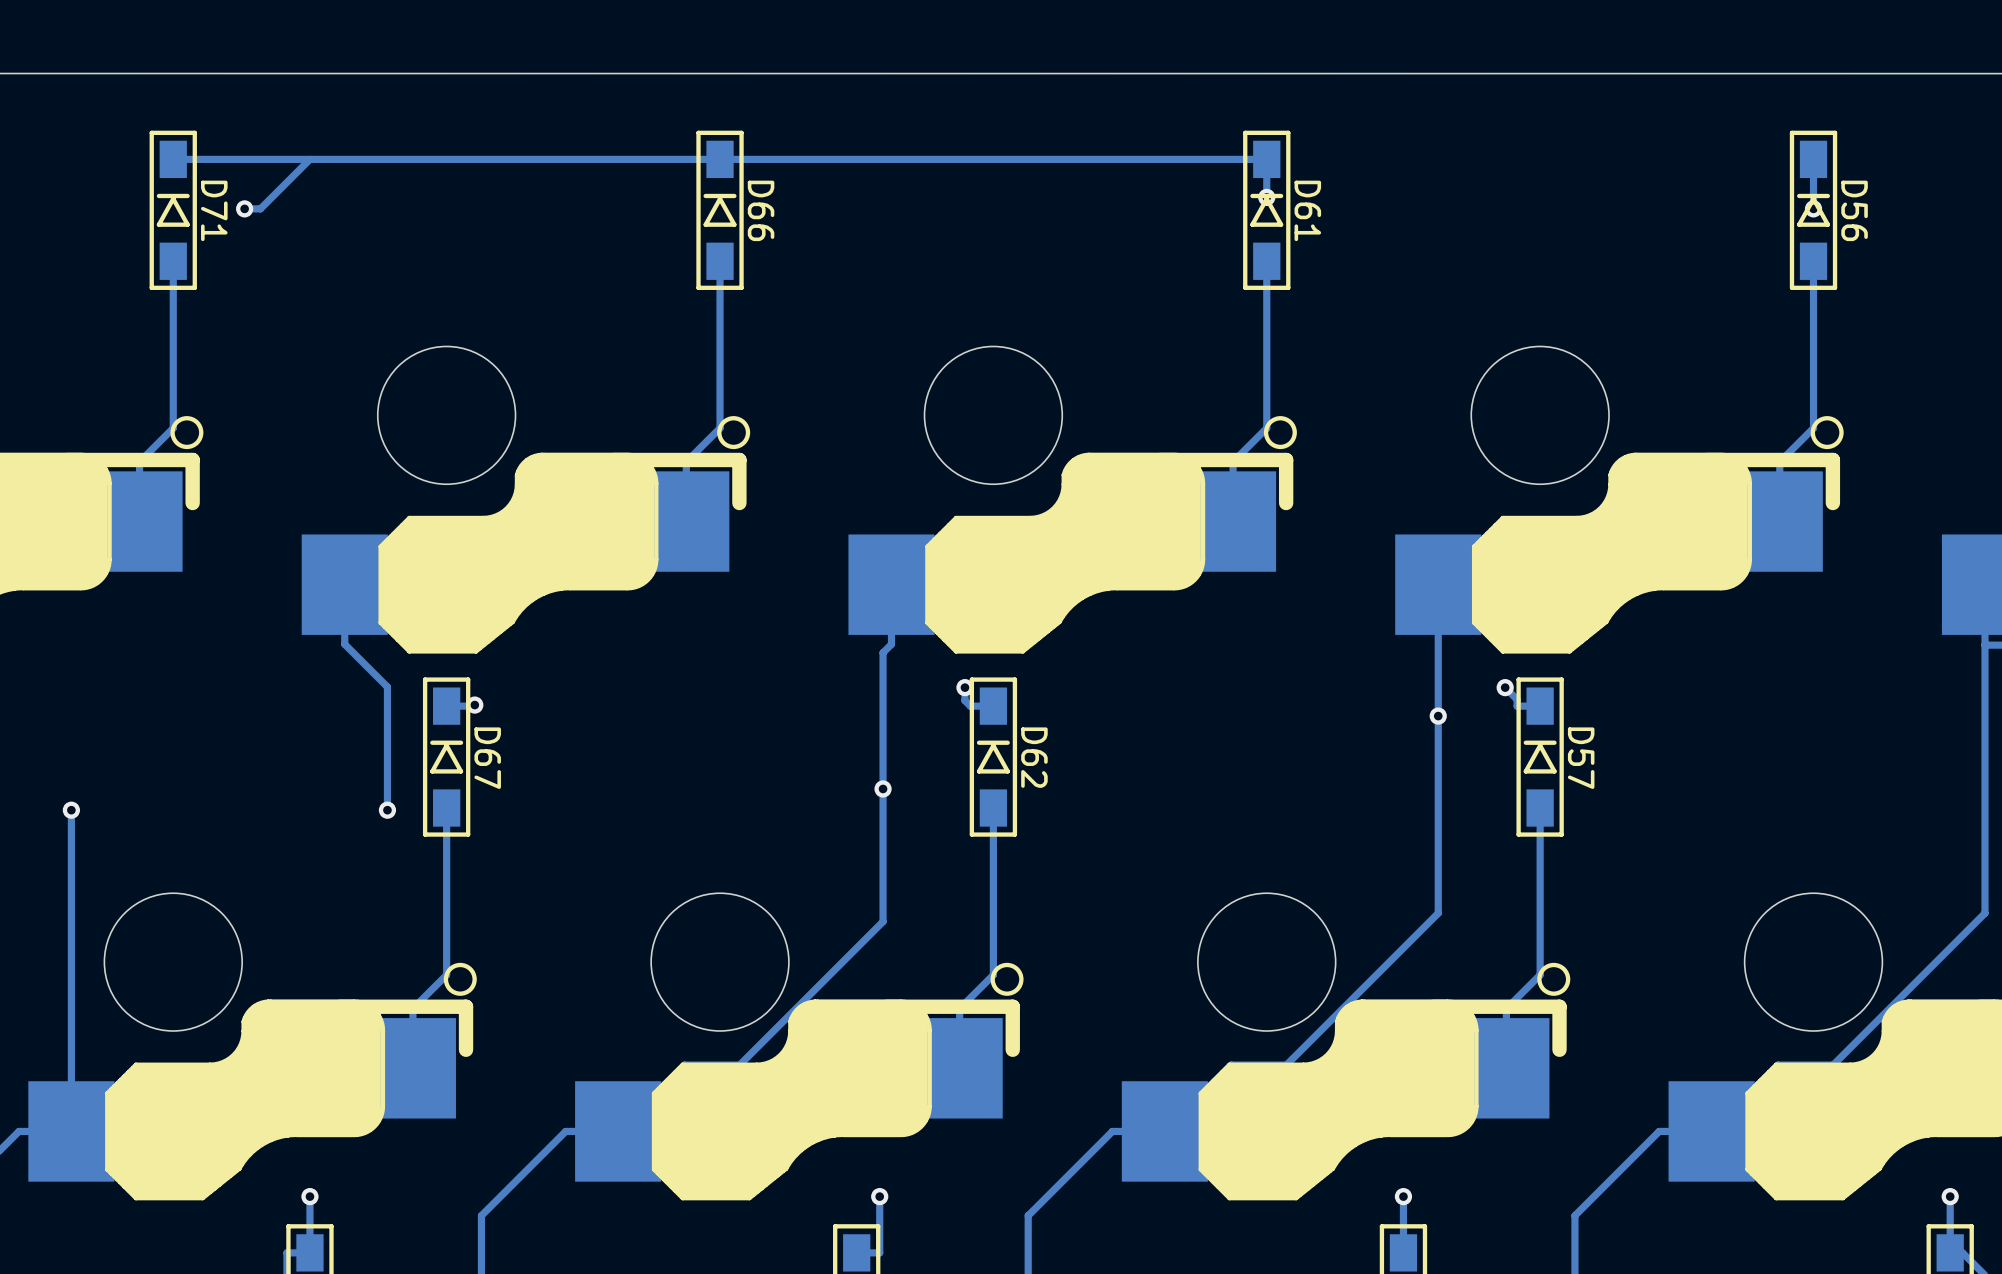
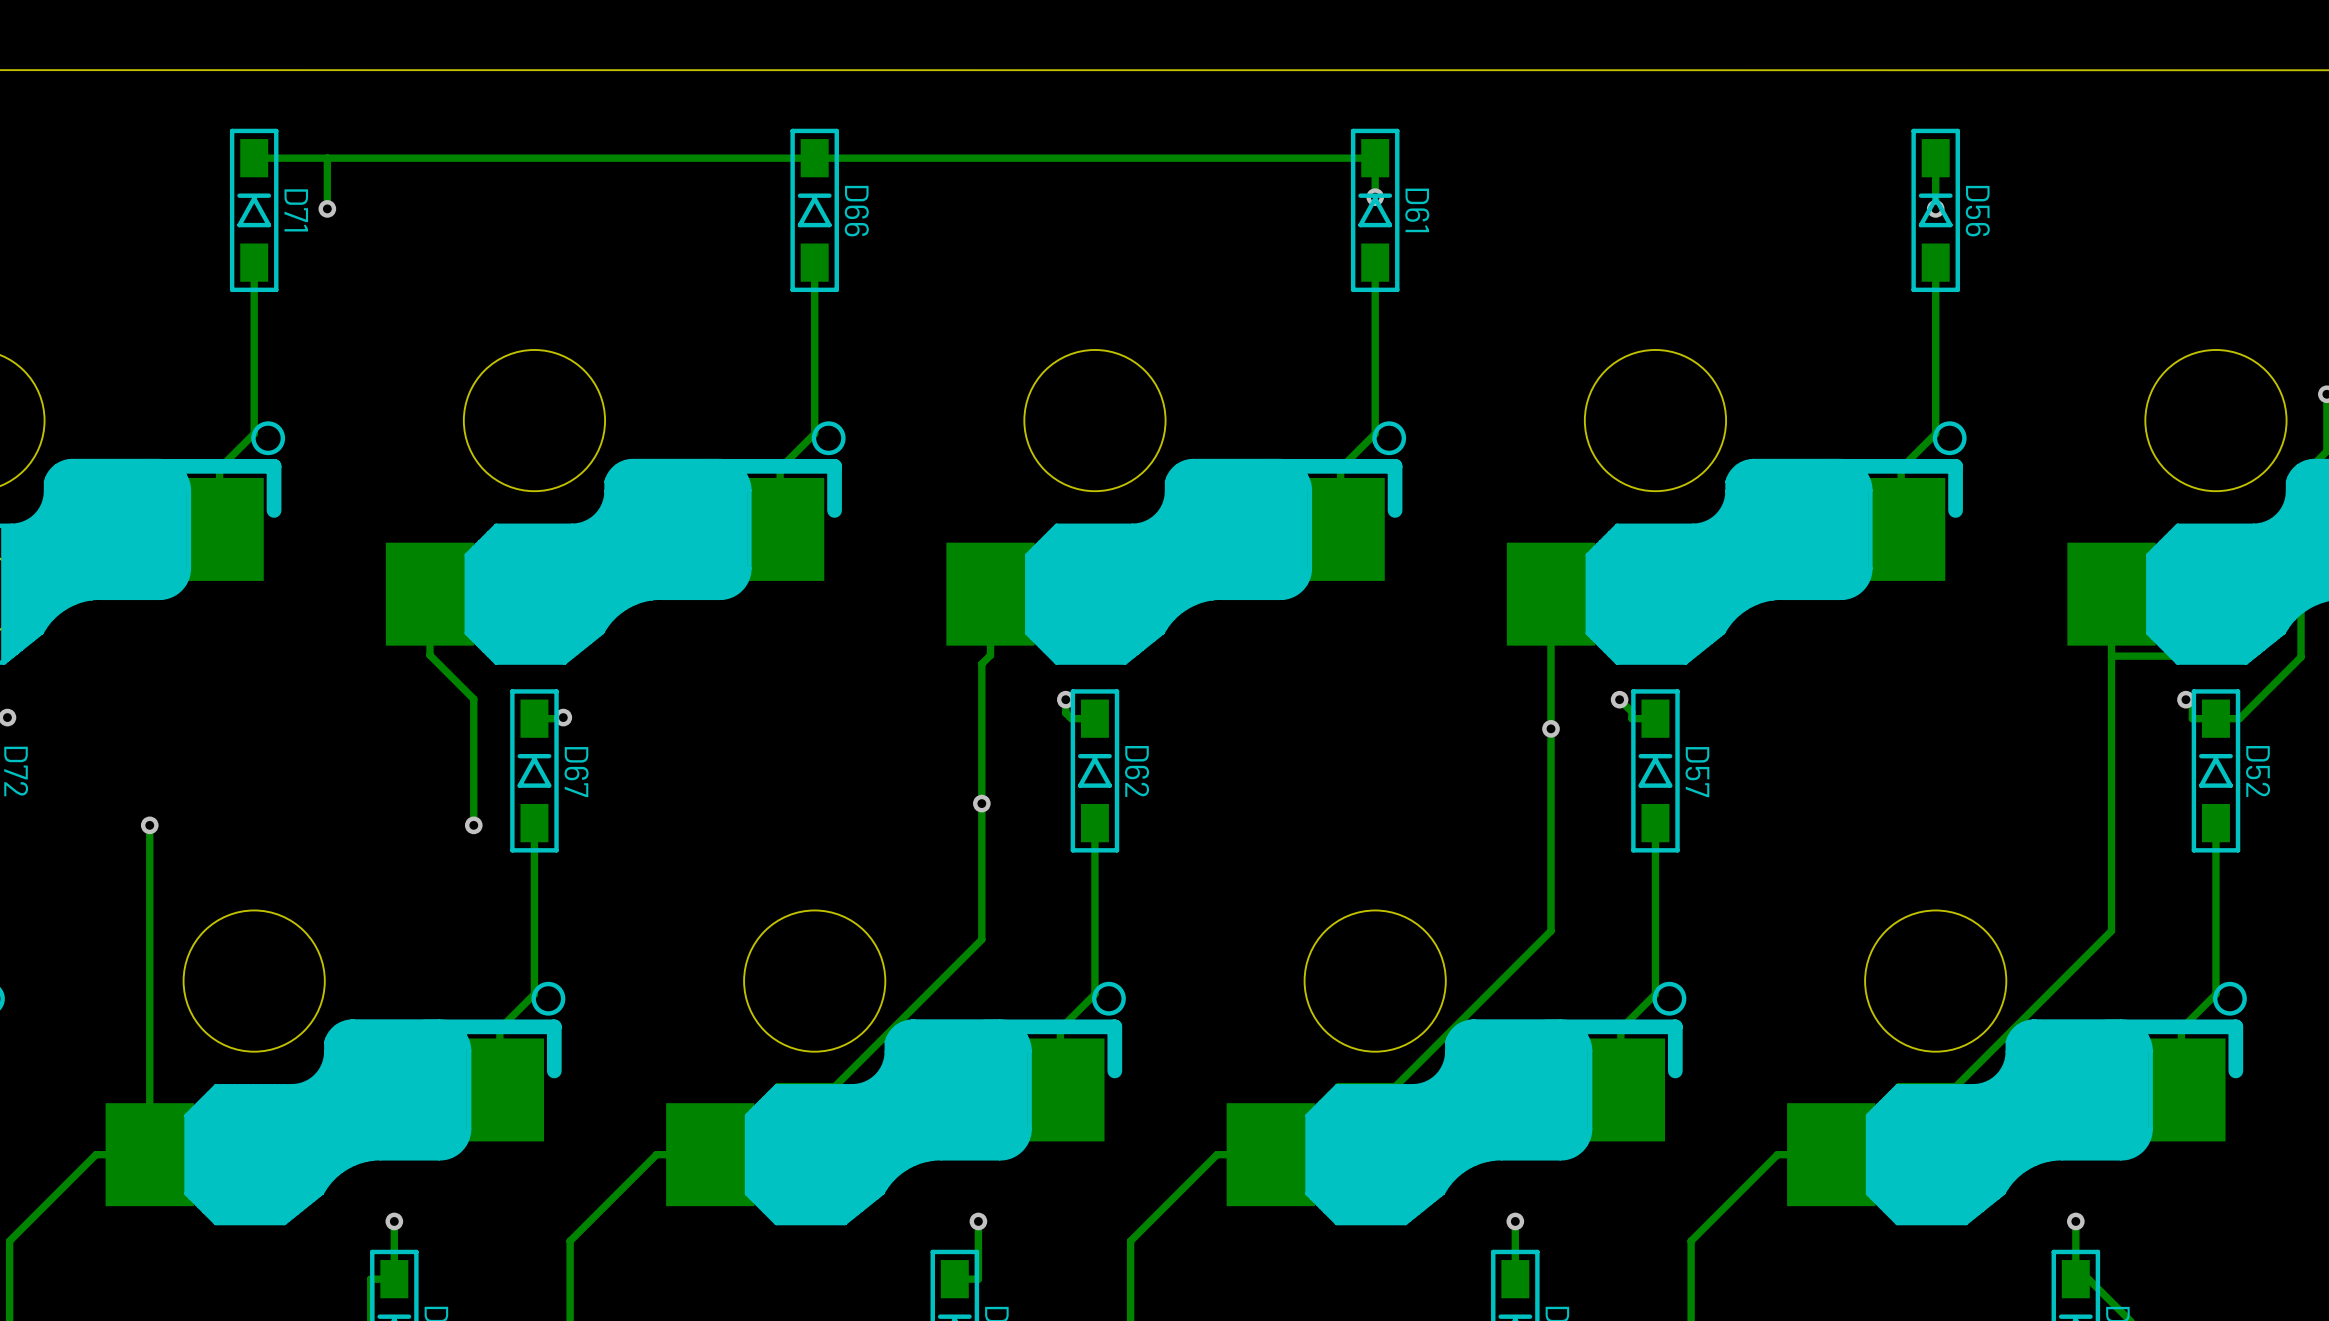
track: (309, 159) (260, 208) (244, 208) -> (327, 158) (327, 208)

